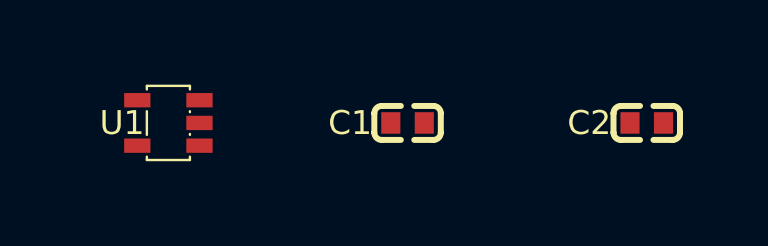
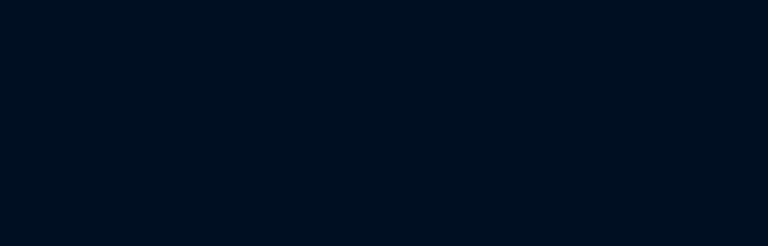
U1: (168, 122) -> none
C1: (407, 122) -> none
C2: (646, 122) -> none

